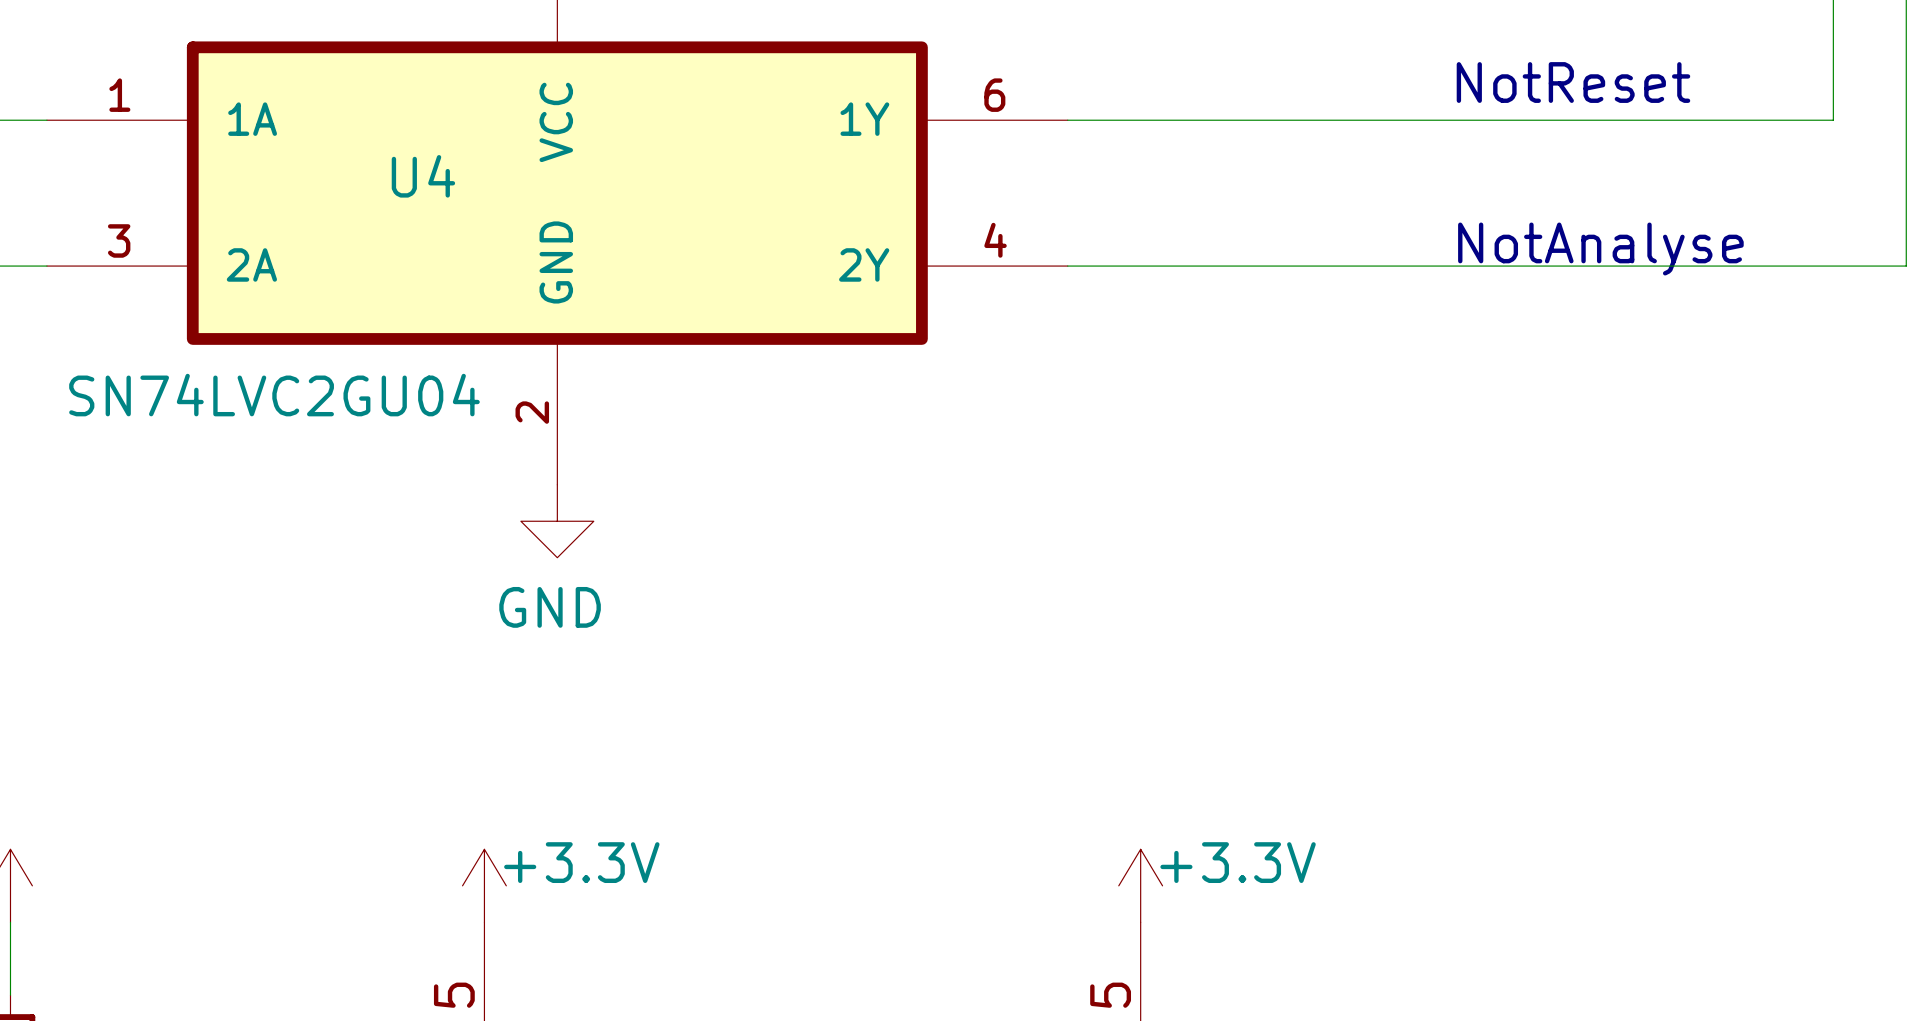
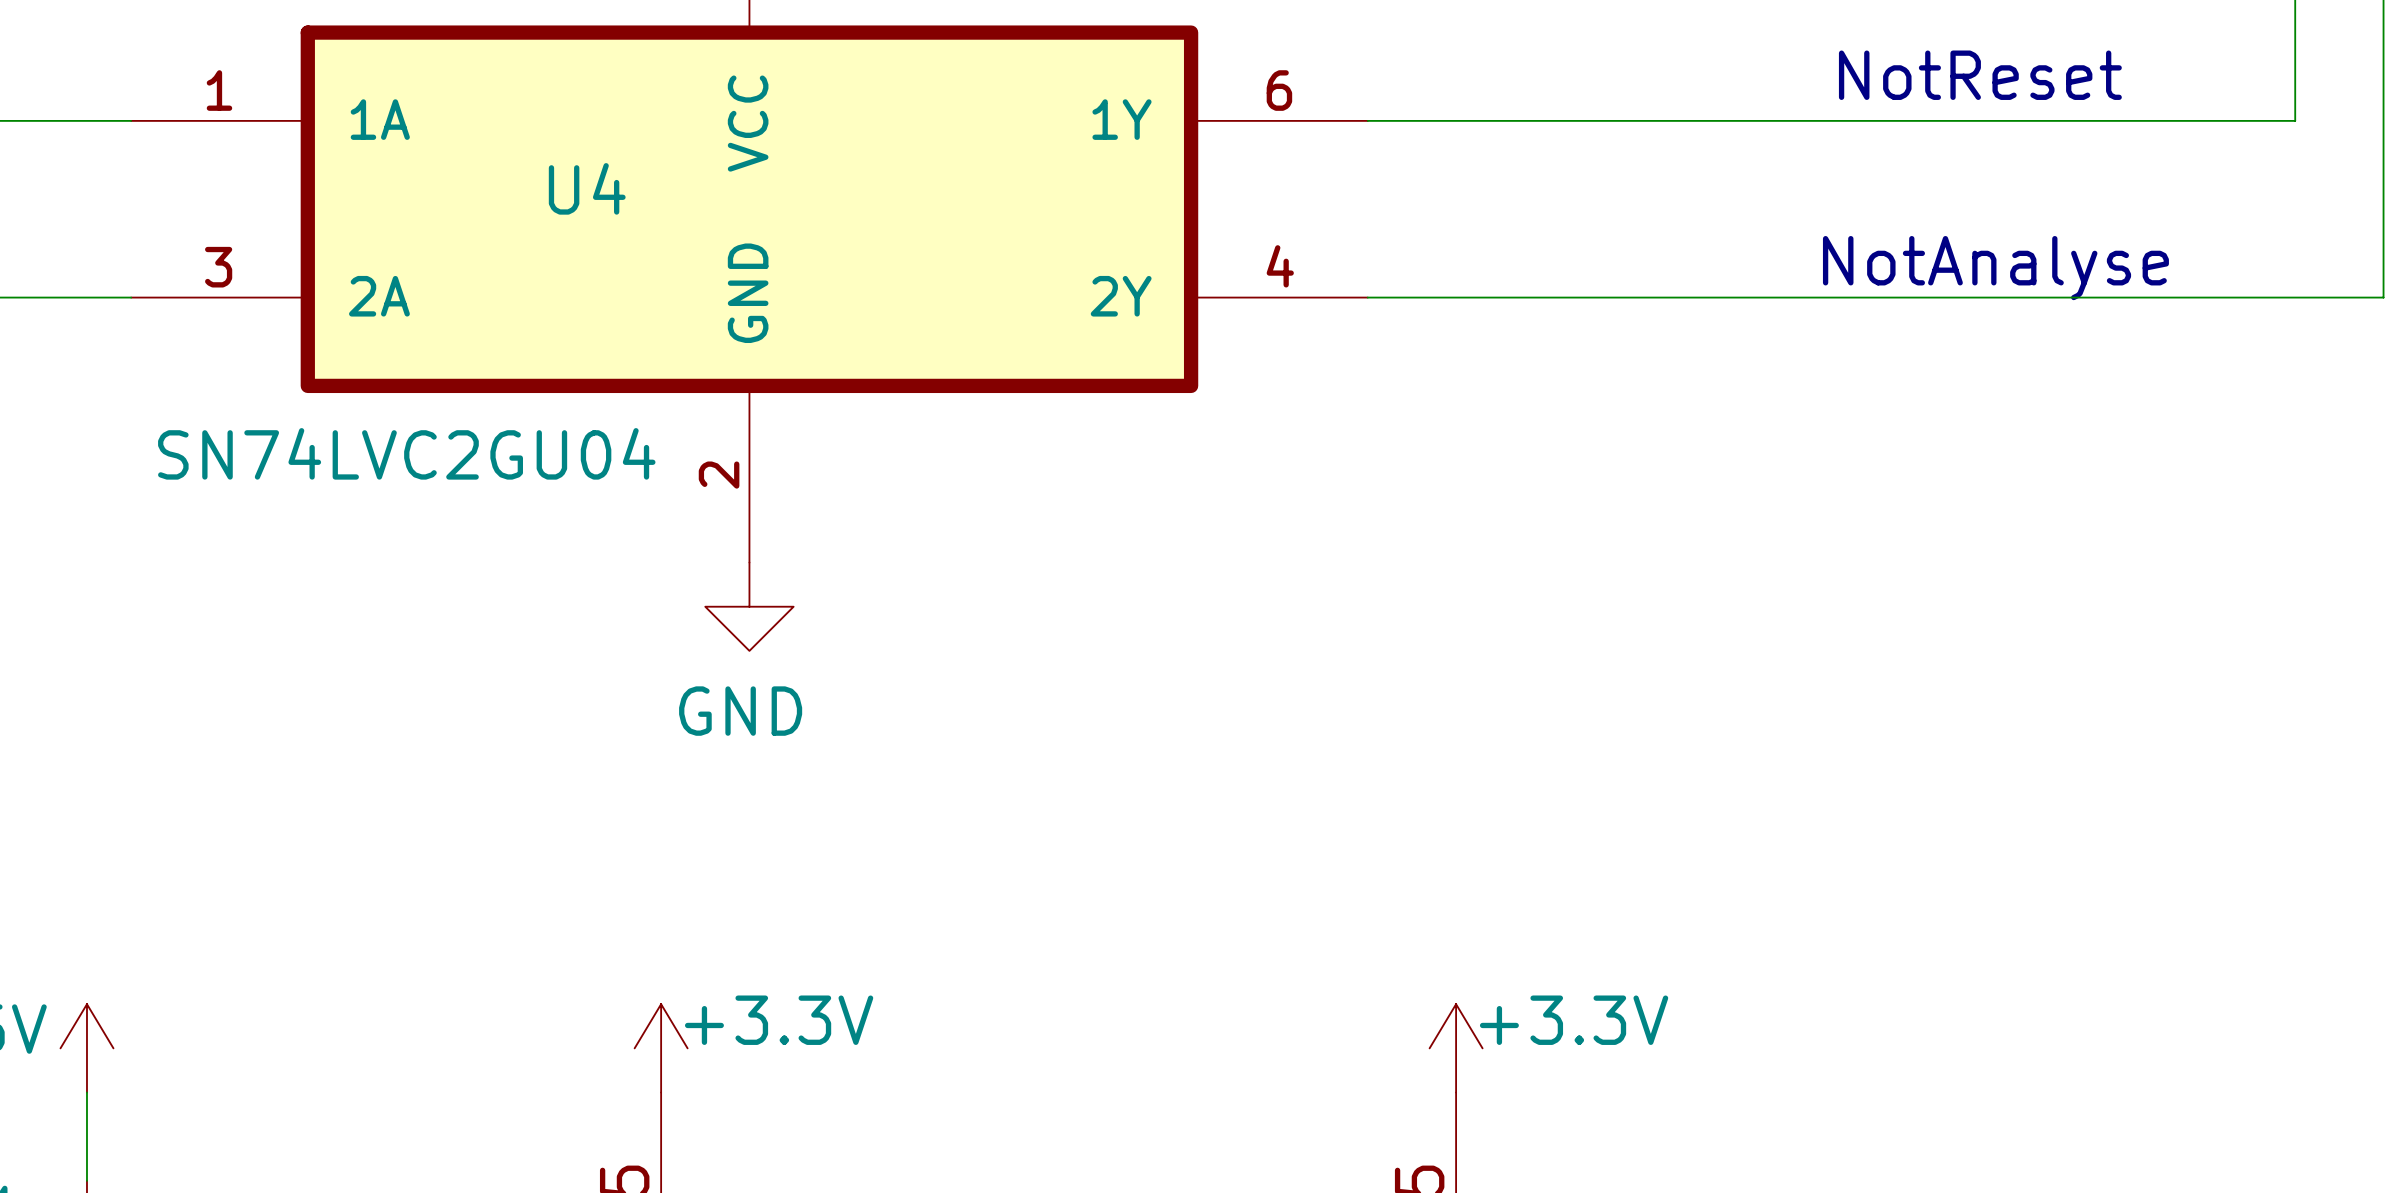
text position: NotAnalyse (1600, 249) -> NotAnalyse (1995, 268)

